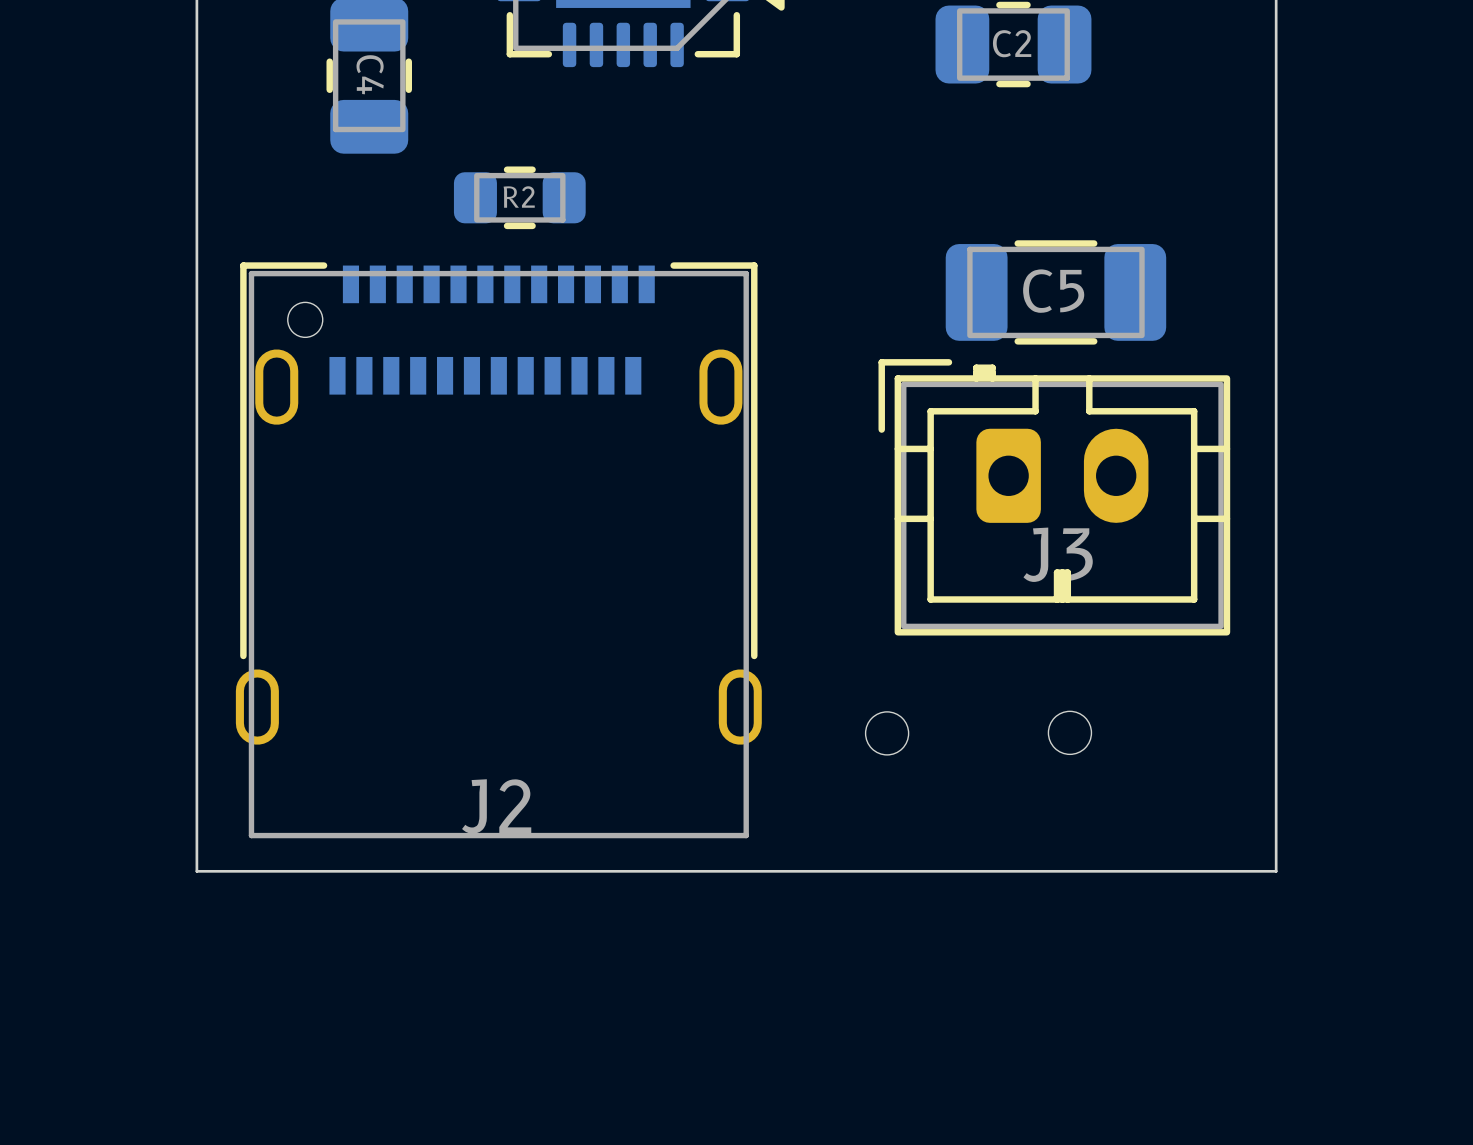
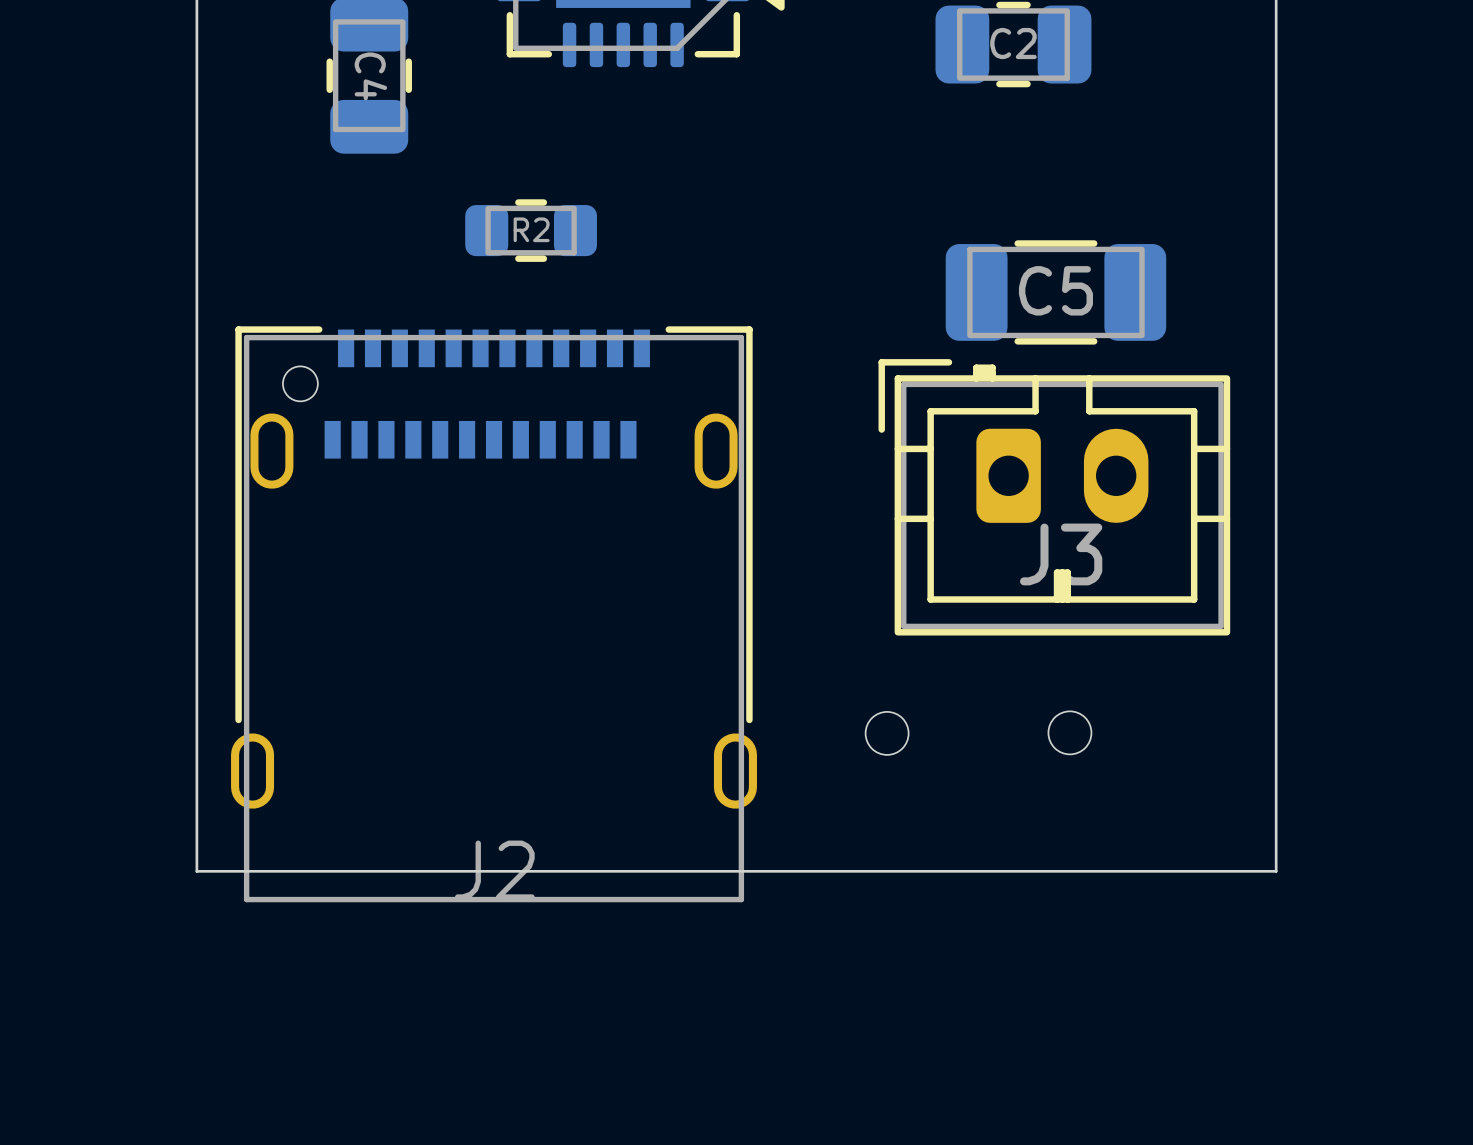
R2 position: (519, 197) -> (531, 230)
J2 position: (498, 550) -> (494, 614)

